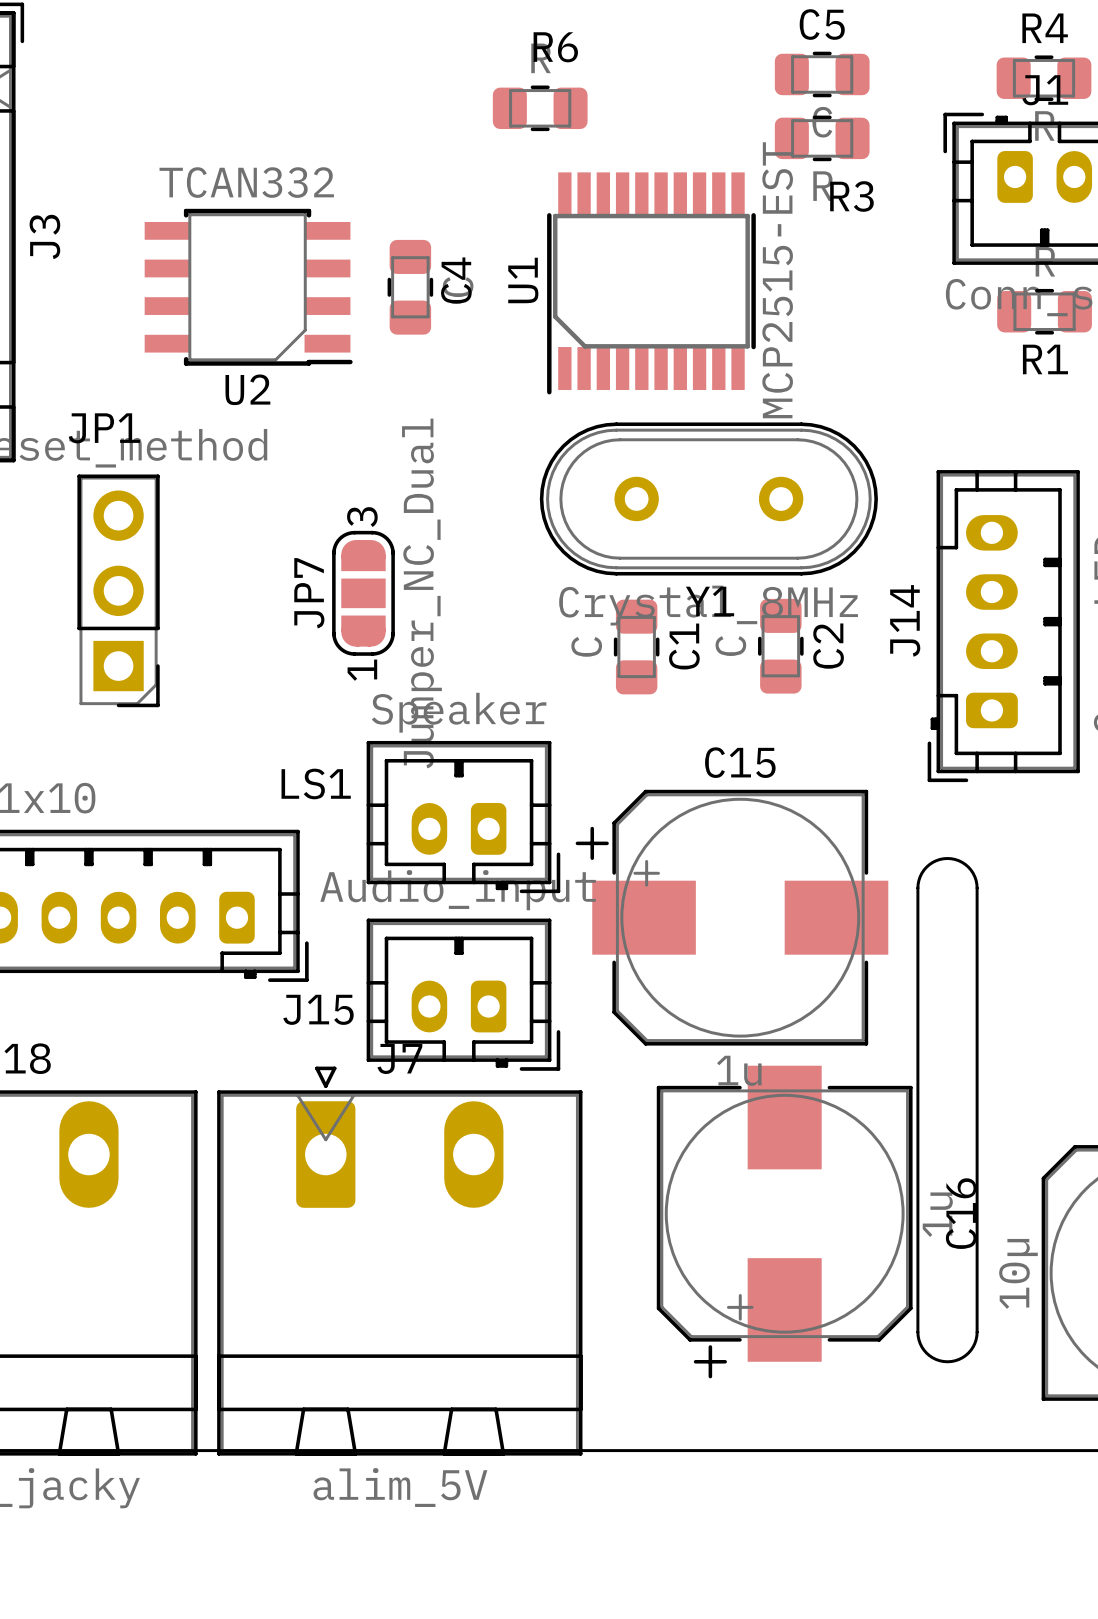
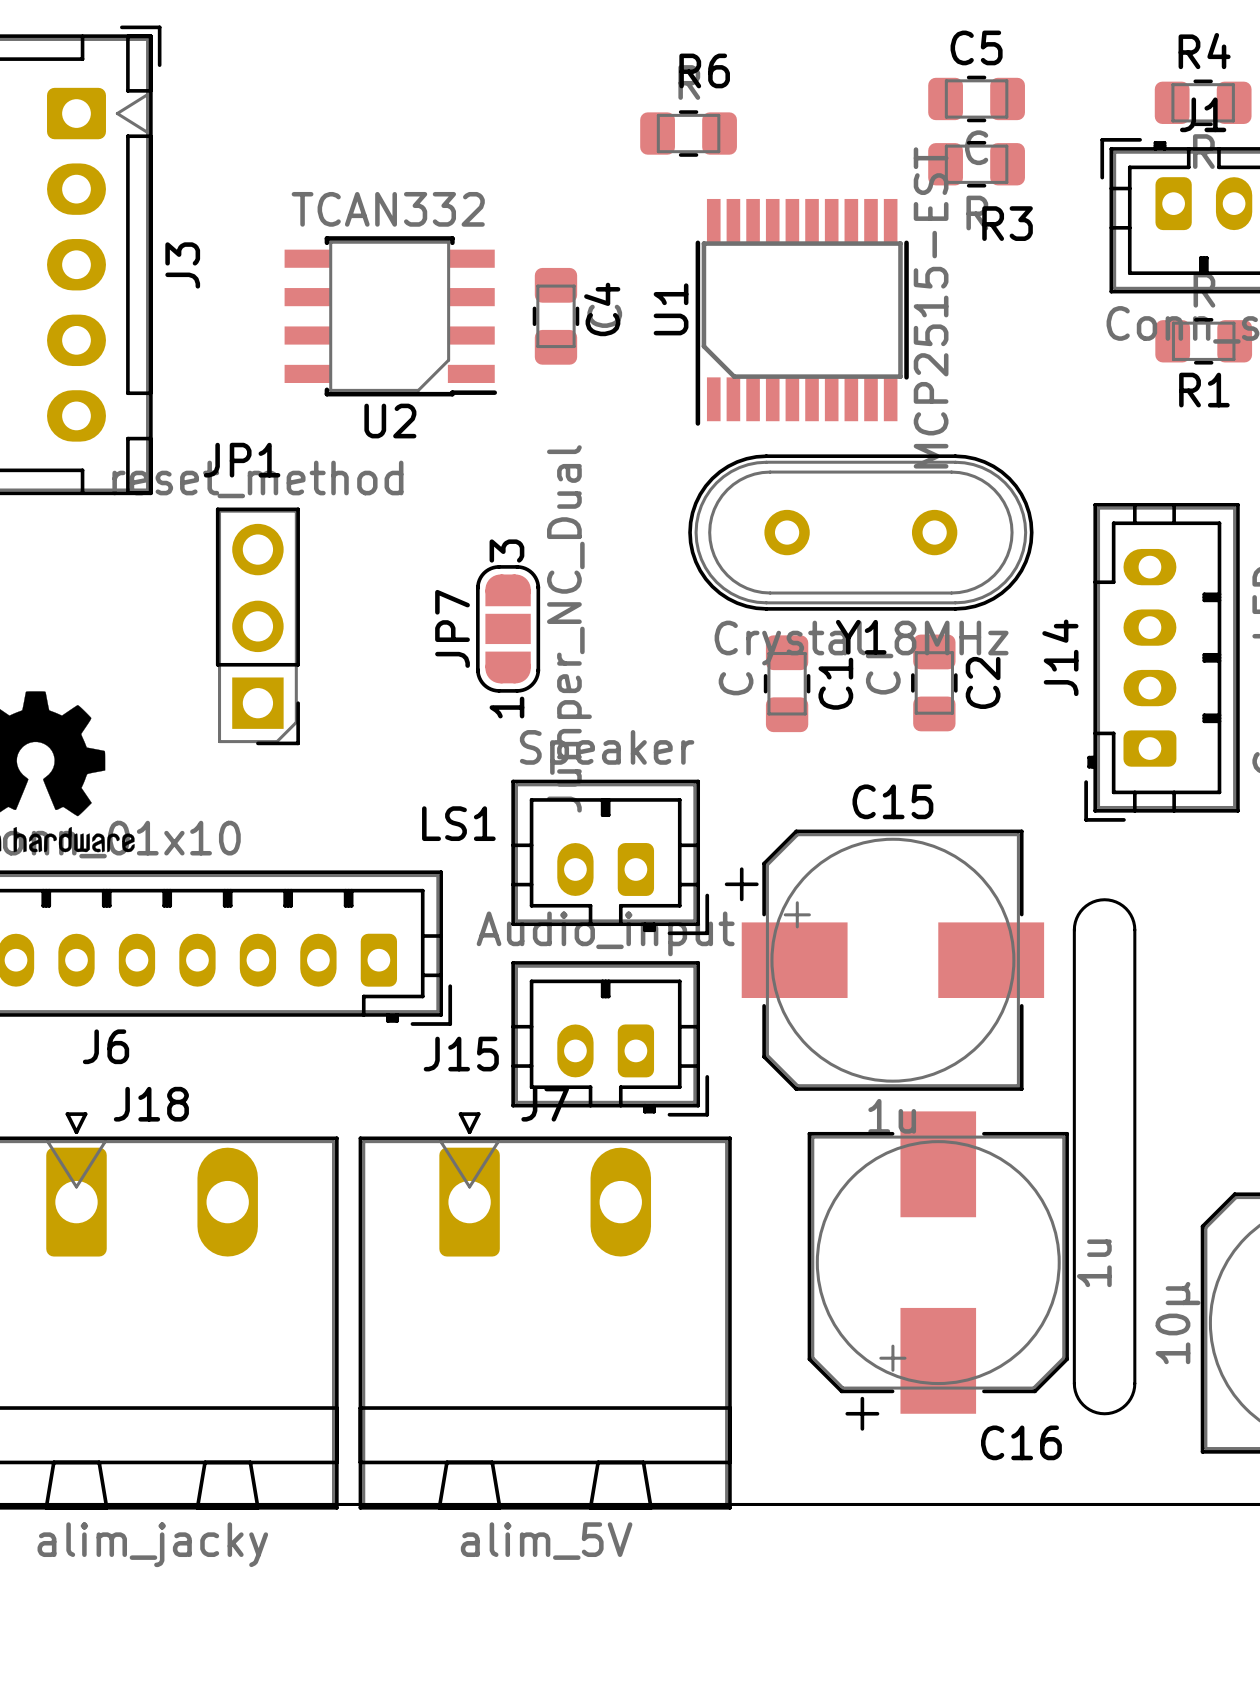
C16 name rotation: 0° (961, 1213) -> 90° clockwise (1021, 1442)
C16 name position: C16 (961, 1213) -> C16 (1021, 1442)

